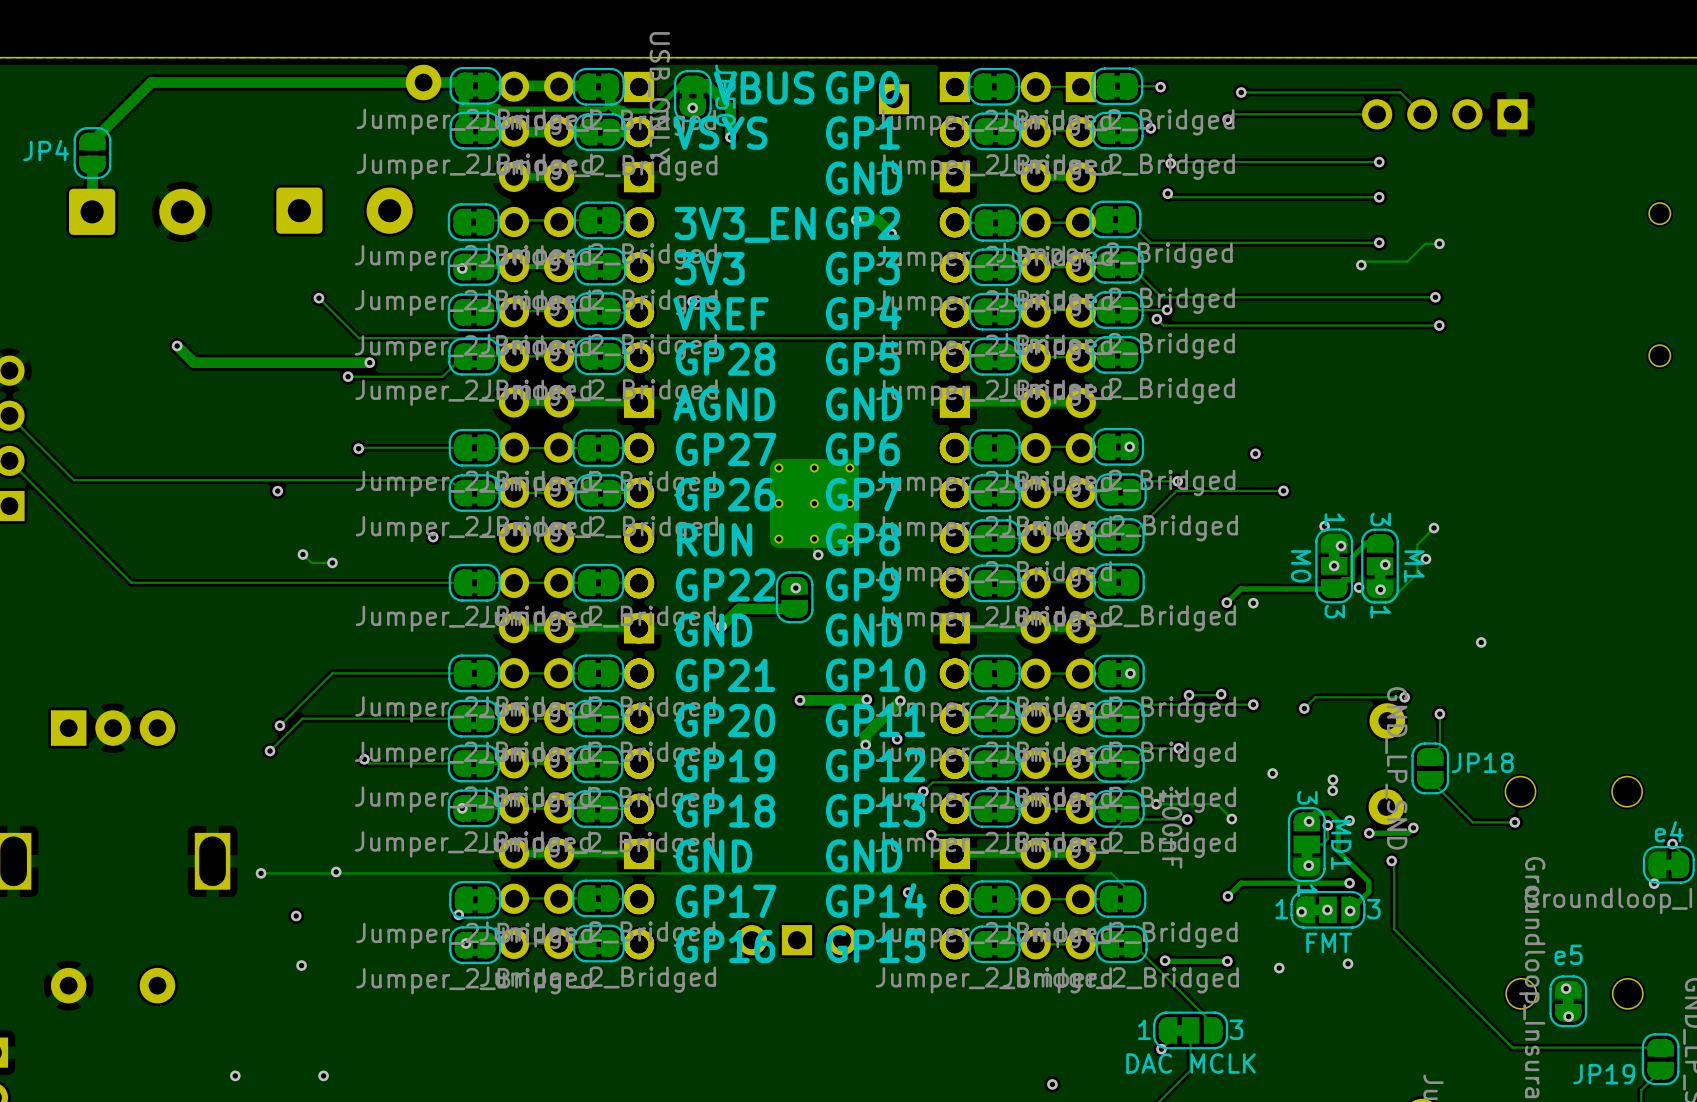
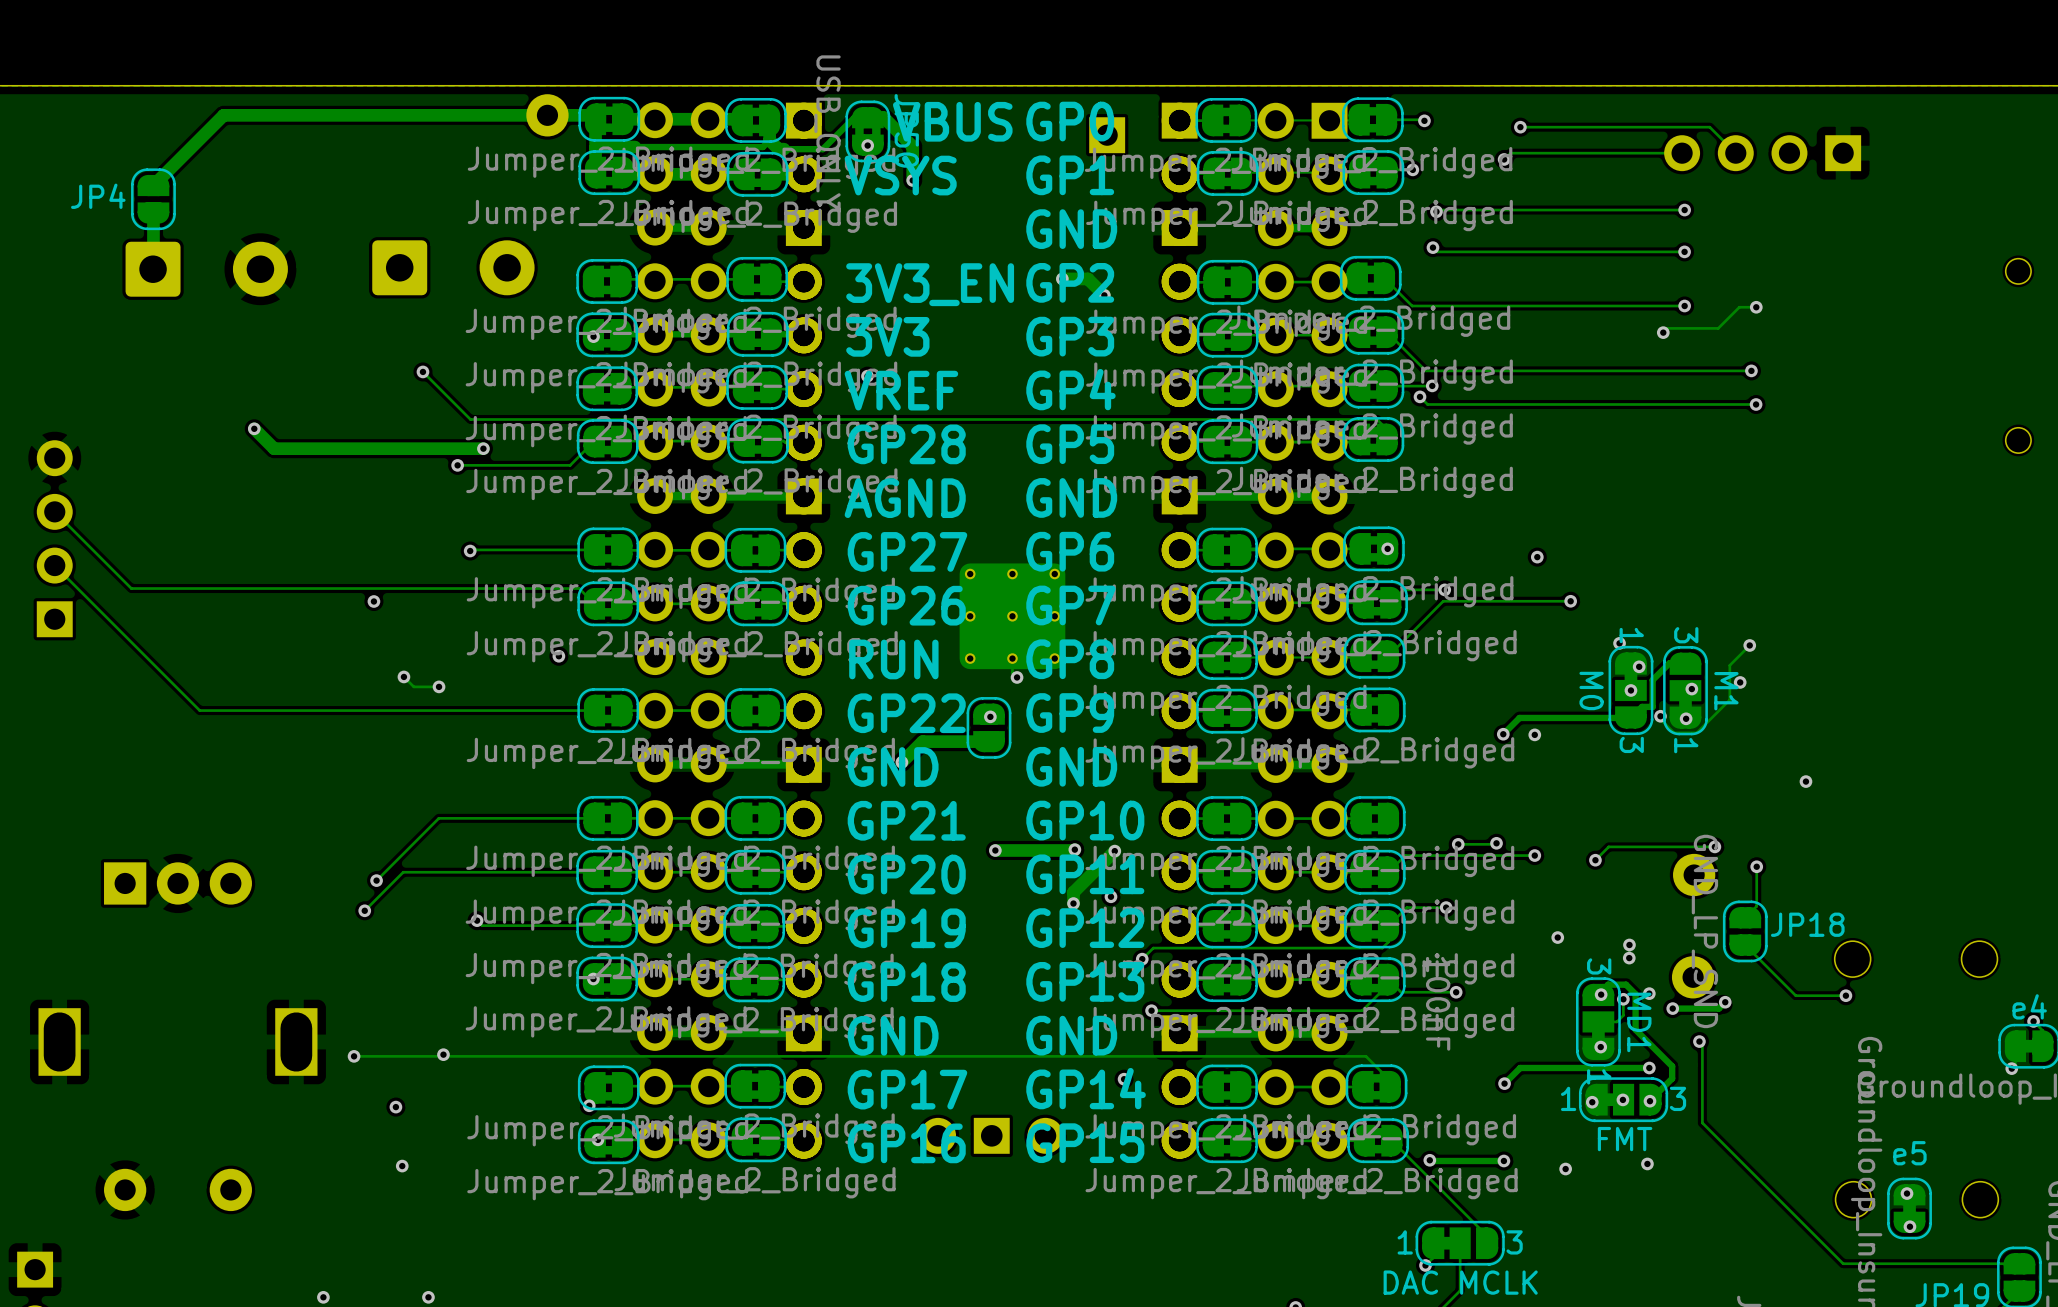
via: (1130, 673) -> none
track: (1156, 804) (1217, 804) (1231, 819) -> none
via: (1156, 804) -> none
via: (1231, 819) -> none

